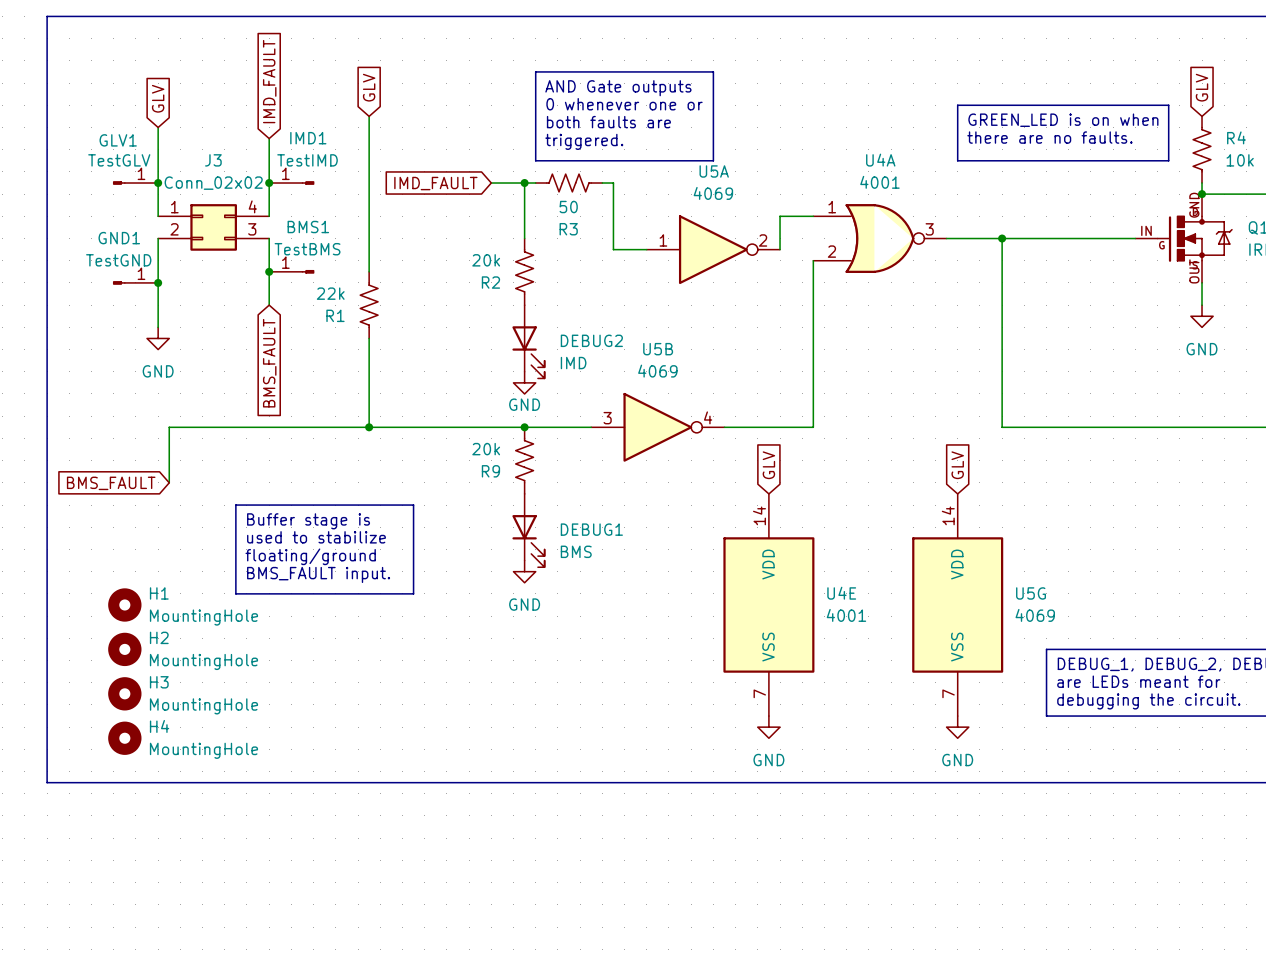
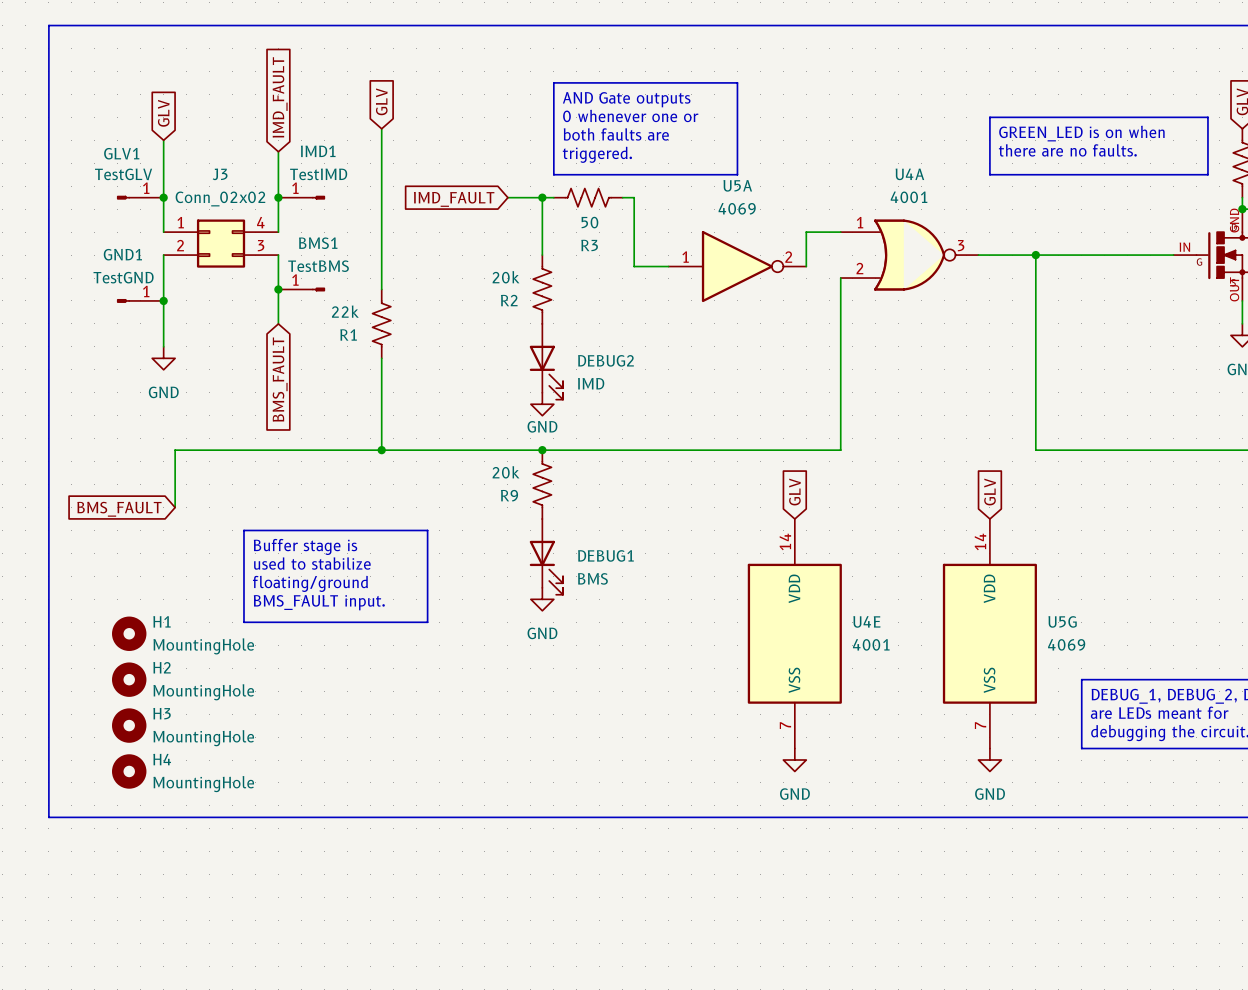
U5B: 4069 (657, 427) -> none

